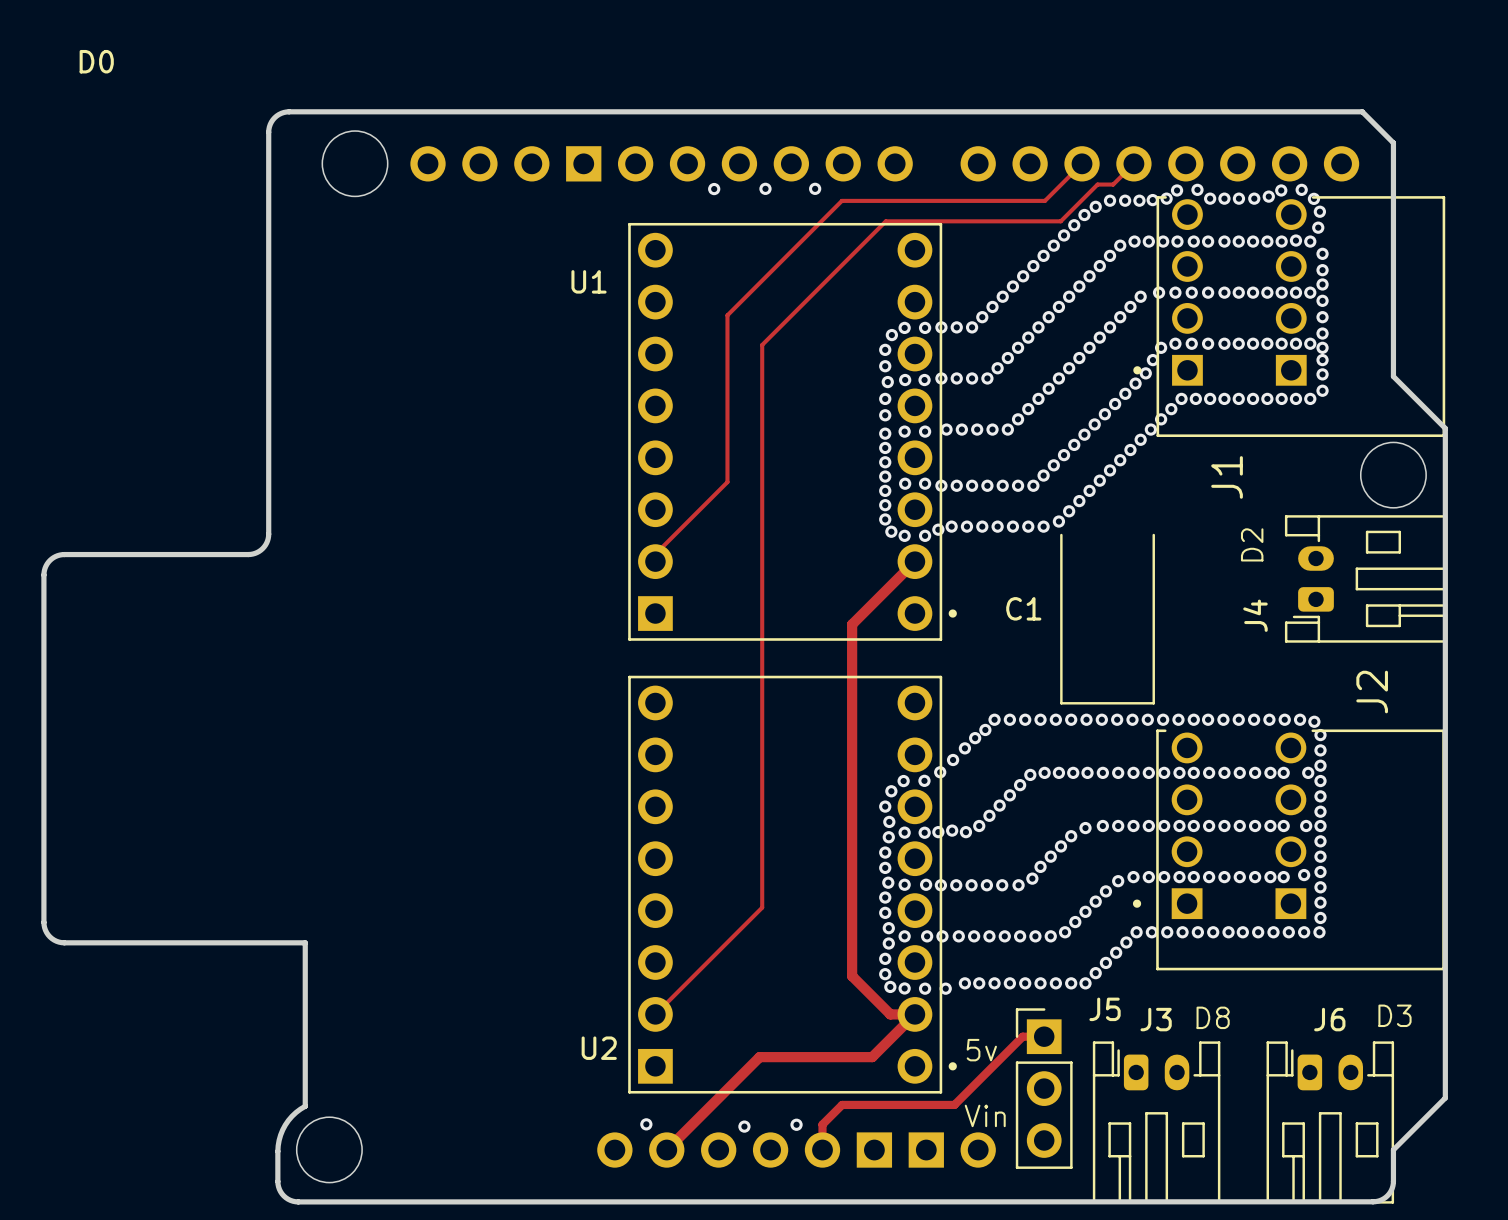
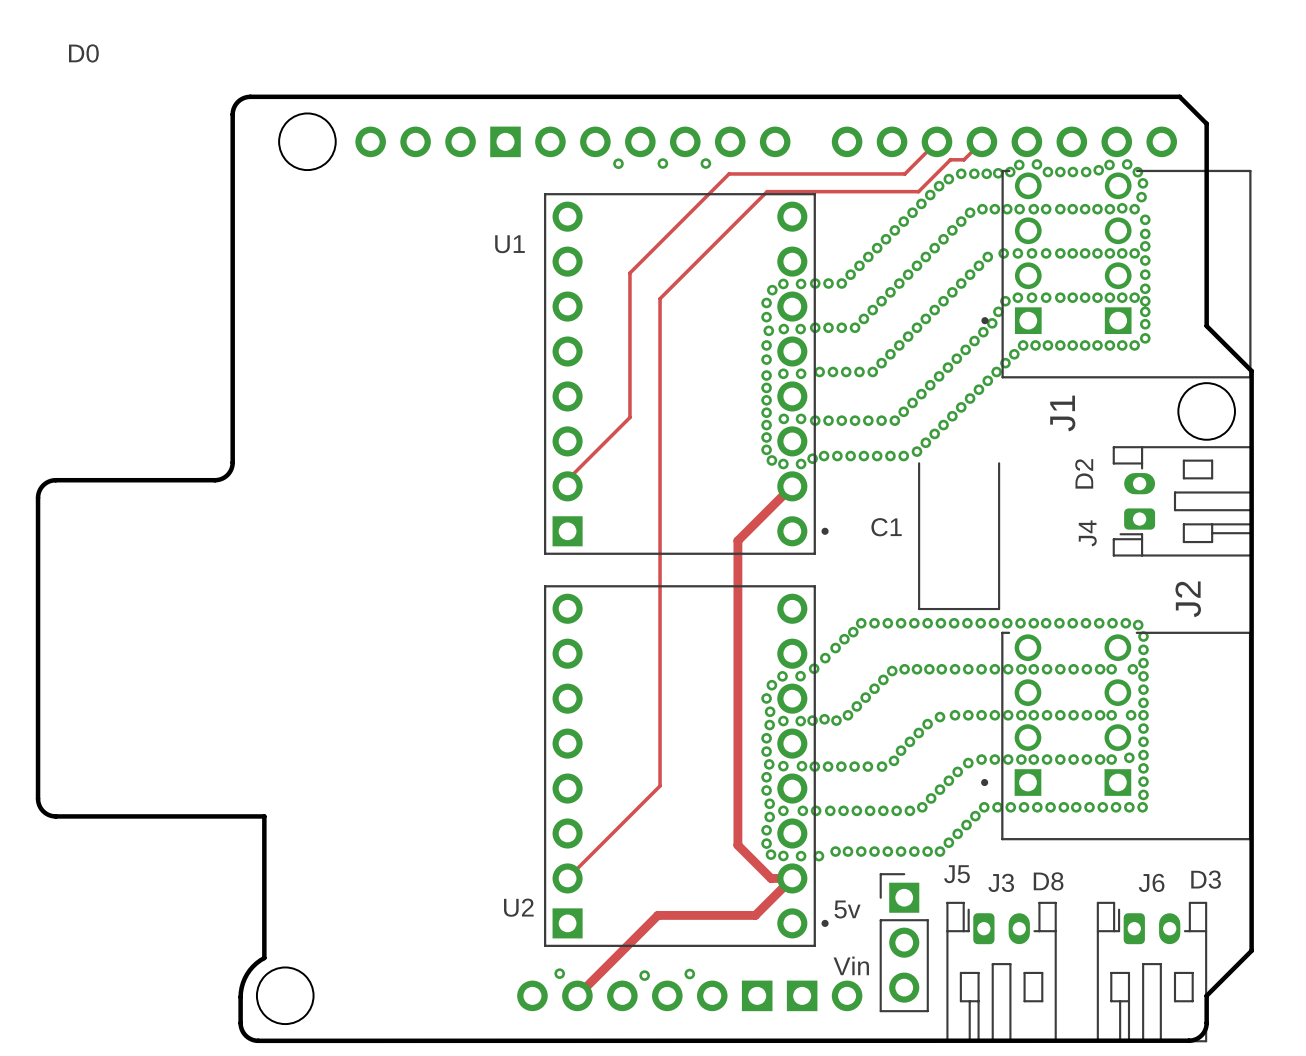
track: (1044, 1036) (1022, 1036) (954, 1104) (842, 1104) (822, 1124) (822, 1150) -> none

